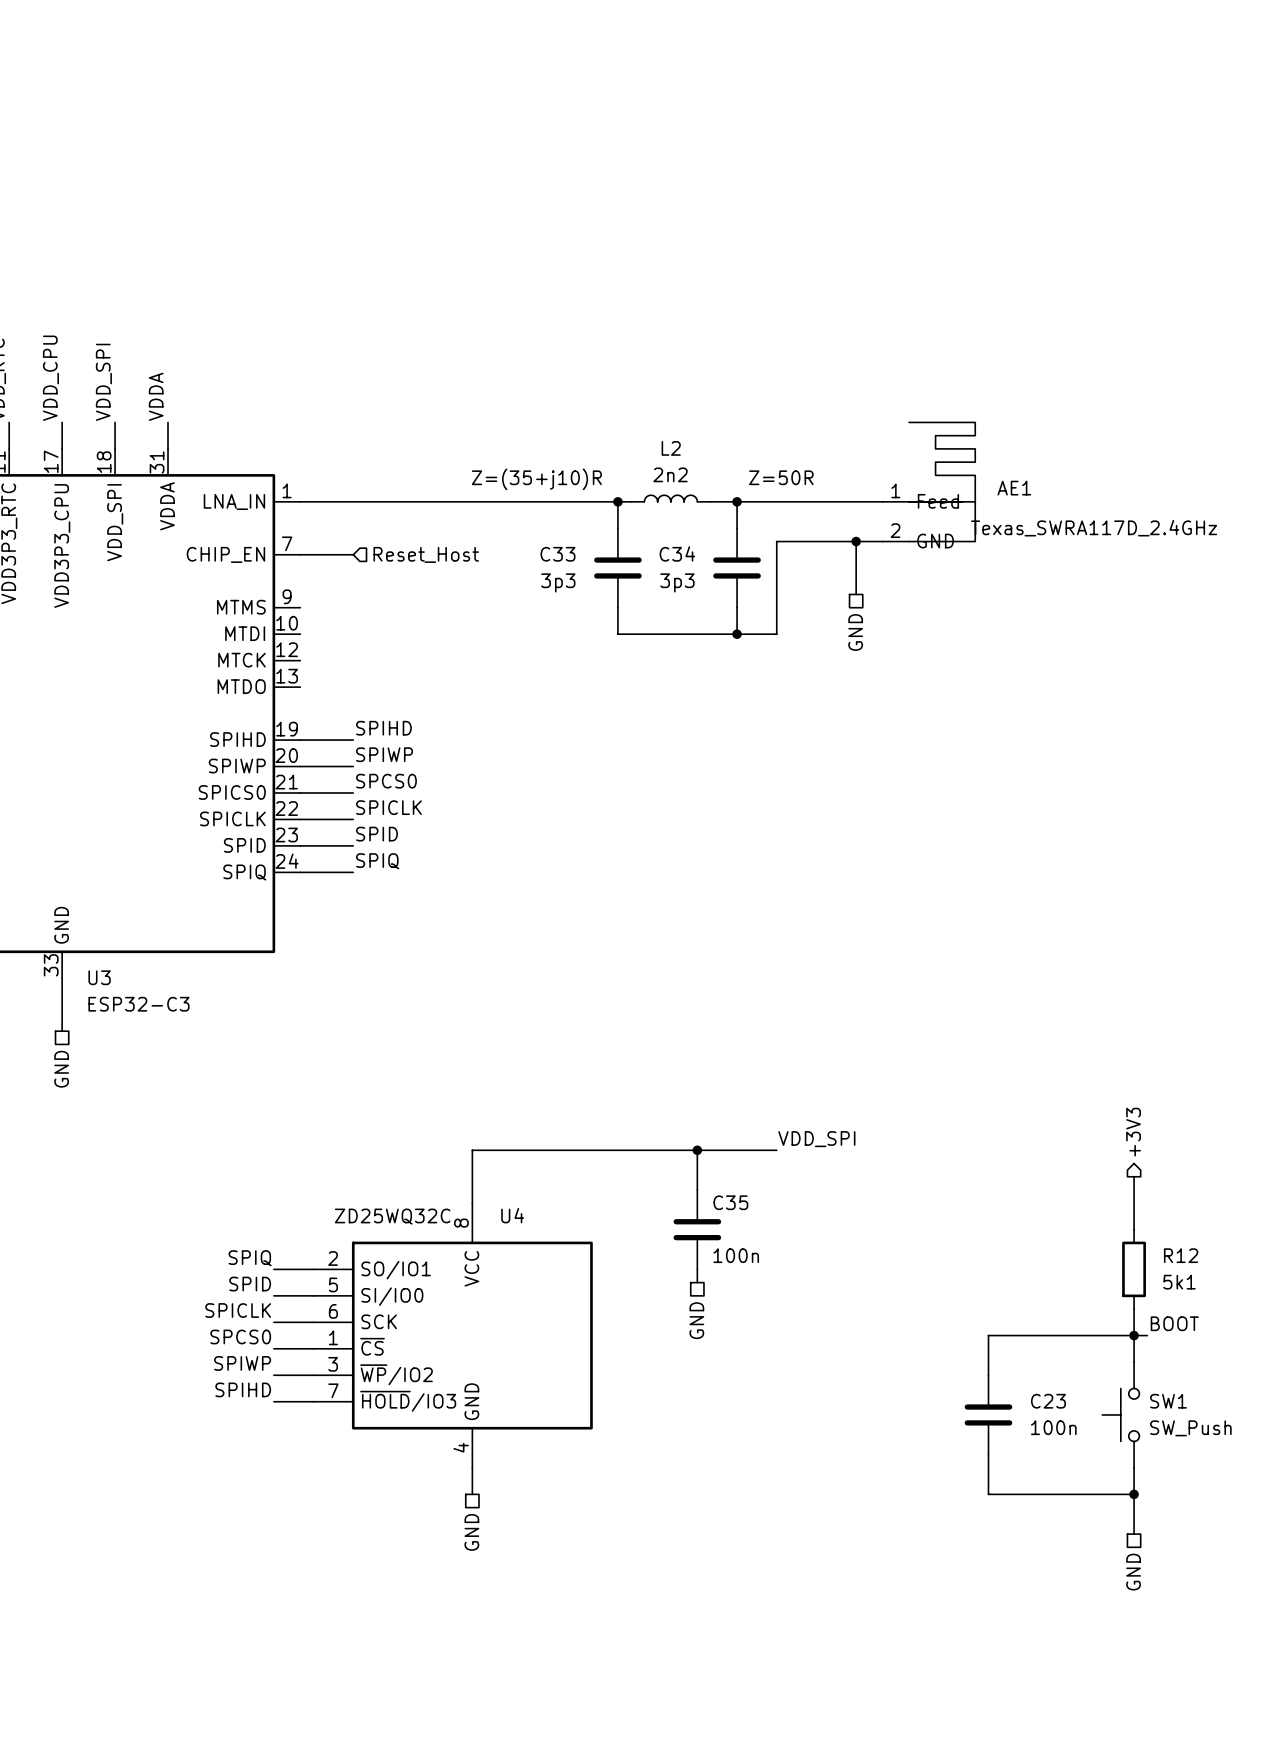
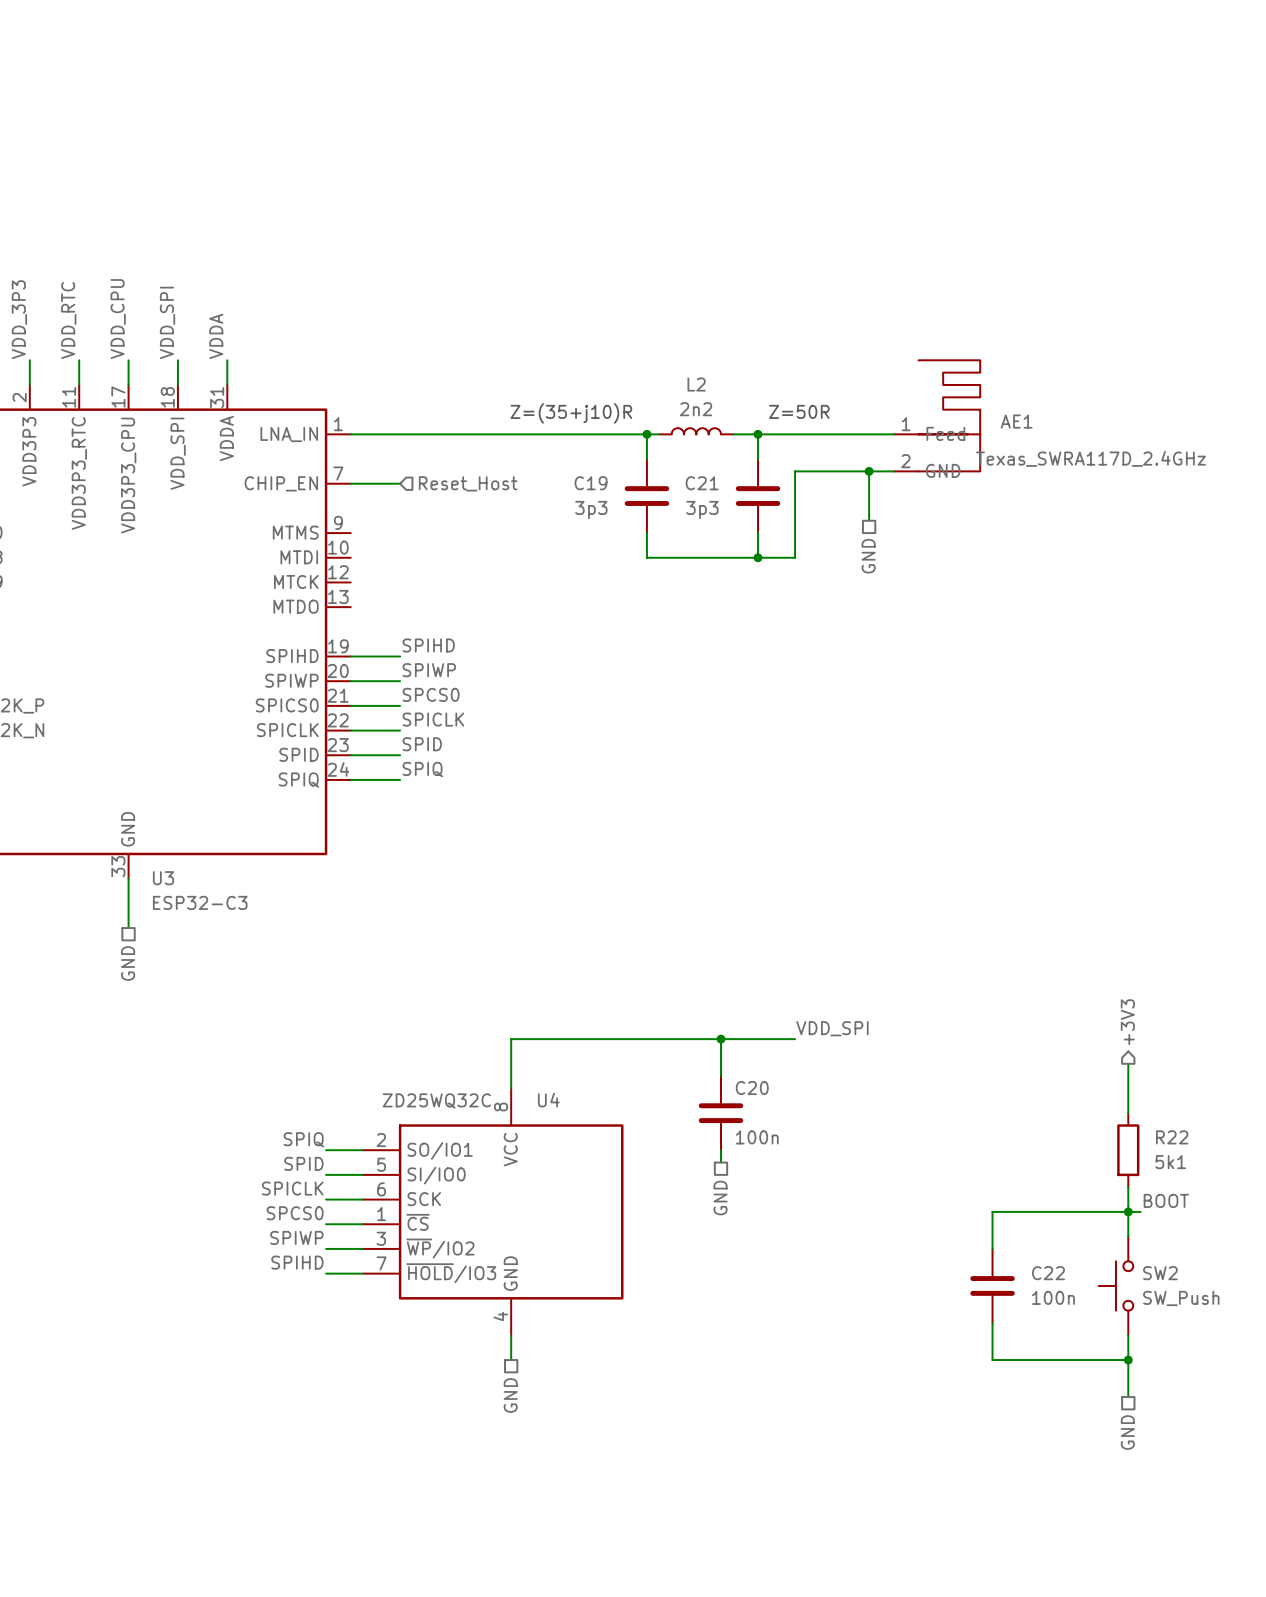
C34 name: C34 (677, 553) -> C21 (702, 483)
C33 name: C33 (557, 554) -> C19 (591, 483)
C35 name: C35 (730, 1202) -> C20 (752, 1088)
R12 name: R12 (1181, 1255) -> R22 (1172, 1137)
C23 name: C23 (1048, 1401) -> C22 (1048, 1273)
SW1 name: SW1 (1168, 1401) -> SW2 (1160, 1273)

